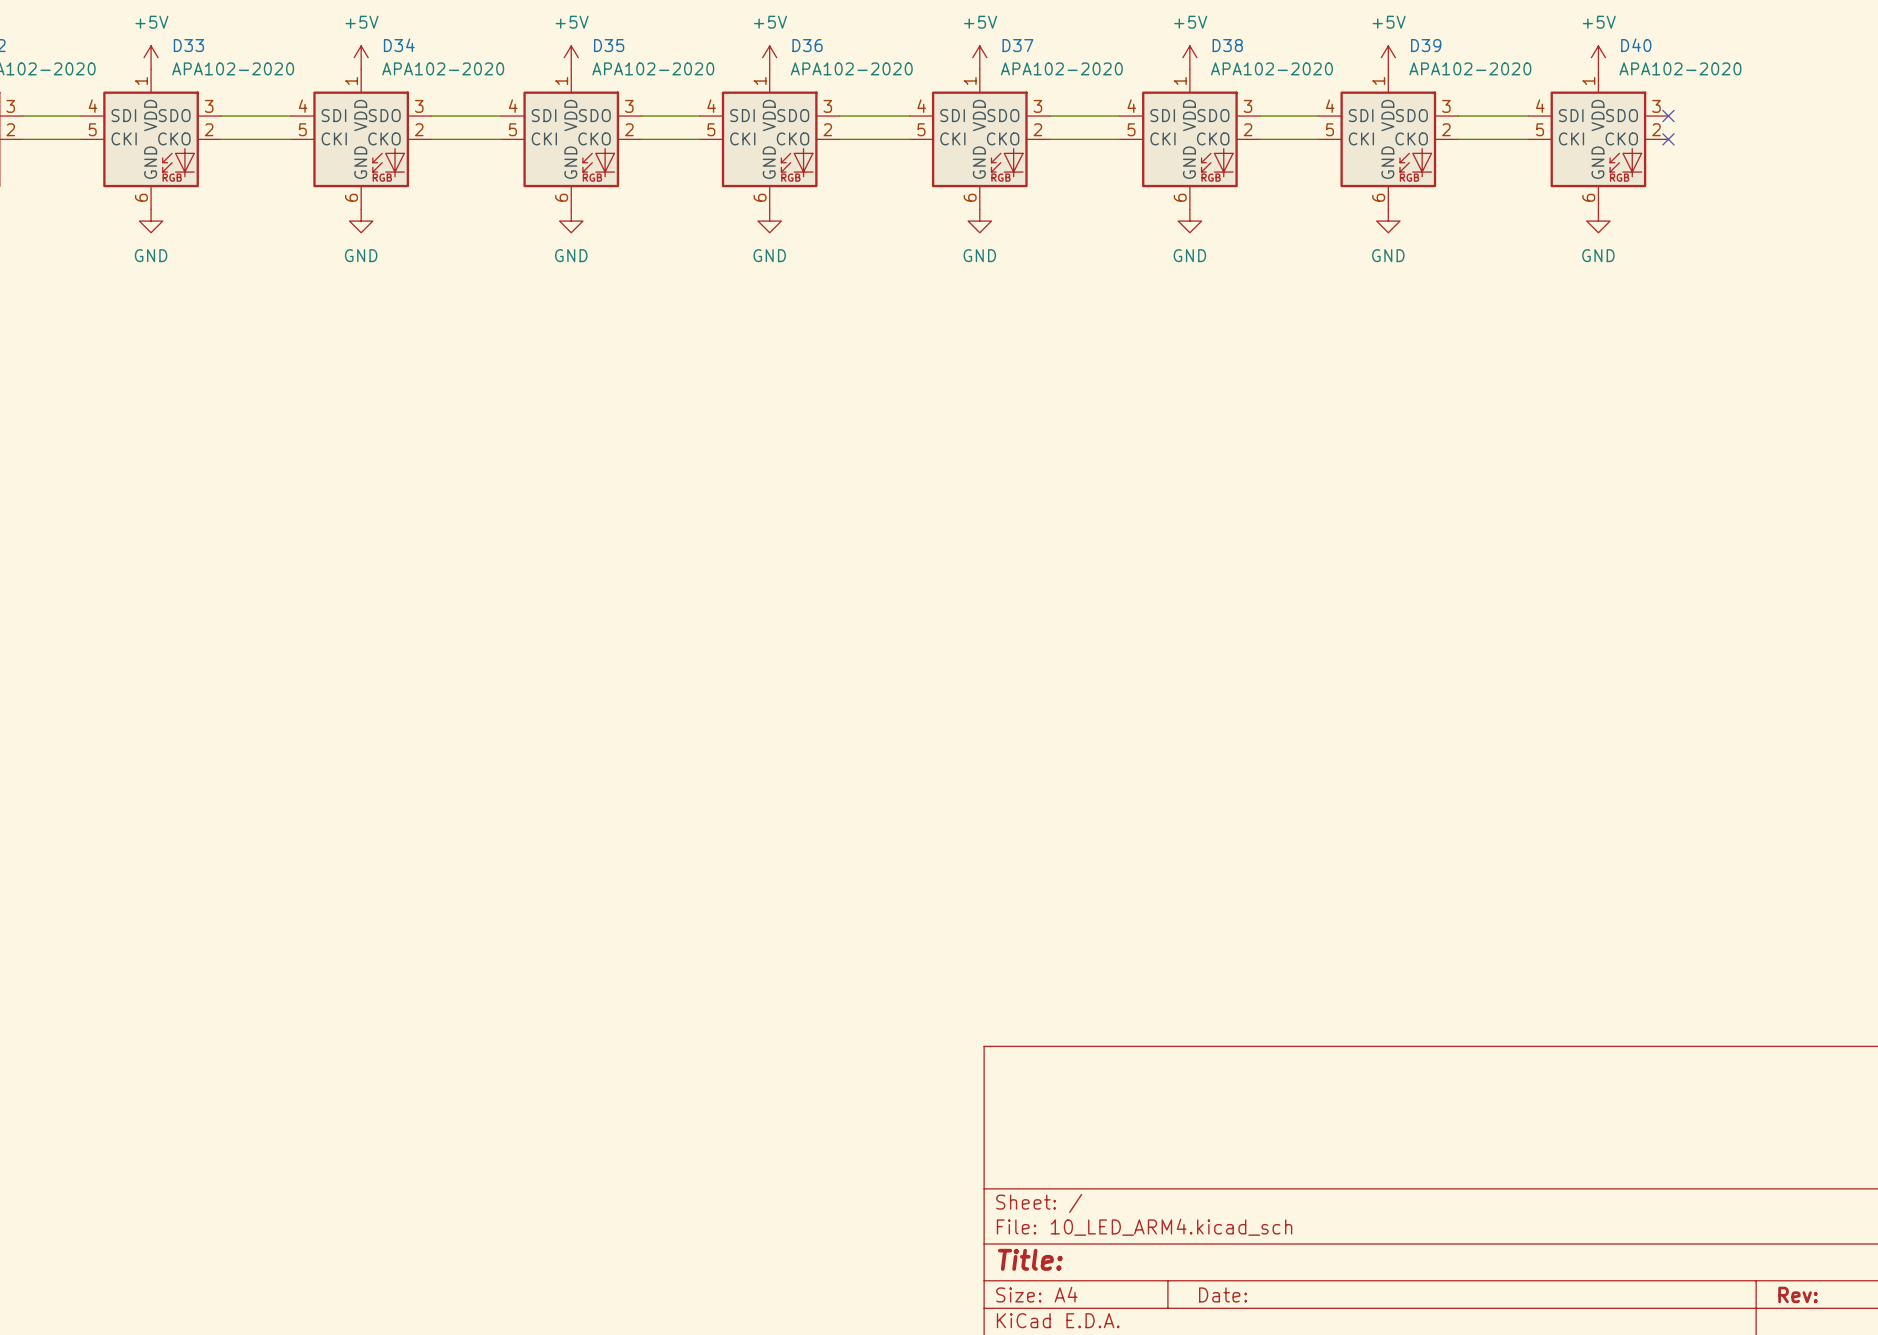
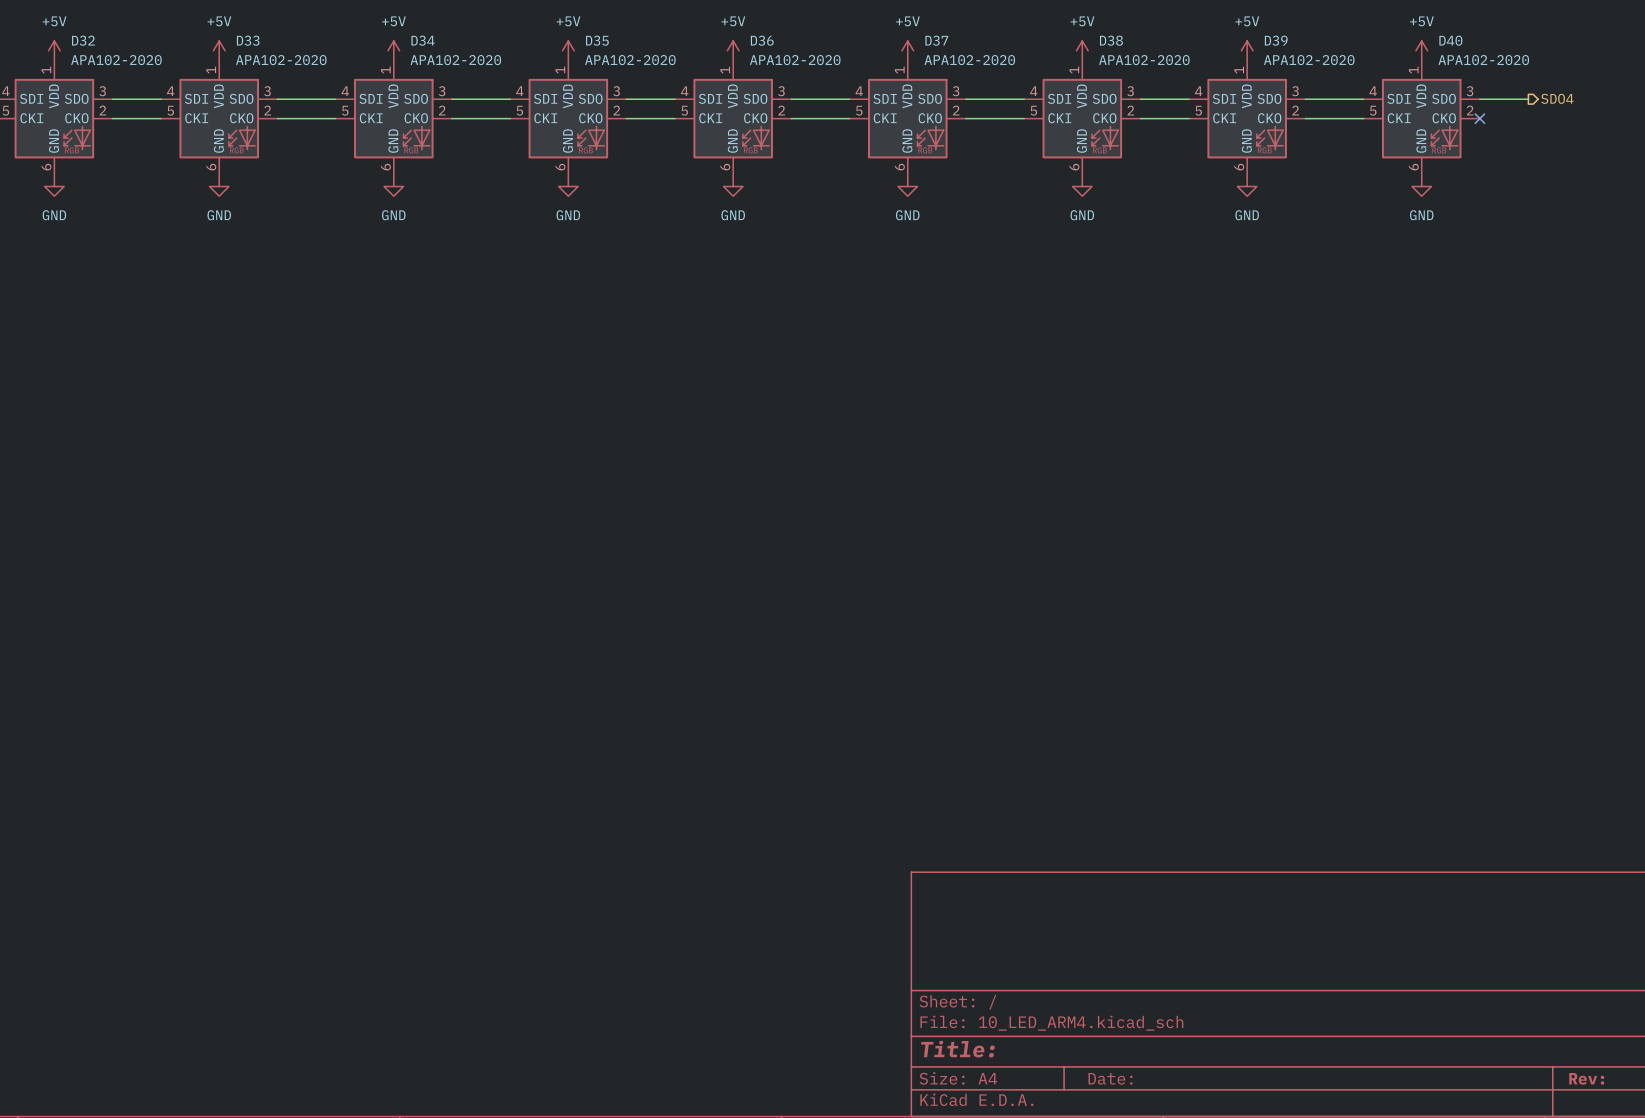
hierarchical label: none -> SDO4 (1557, 98)
wire: none -> (1479, 99) (1528, 99)
no-connect mark: (1668, 116) -> none

